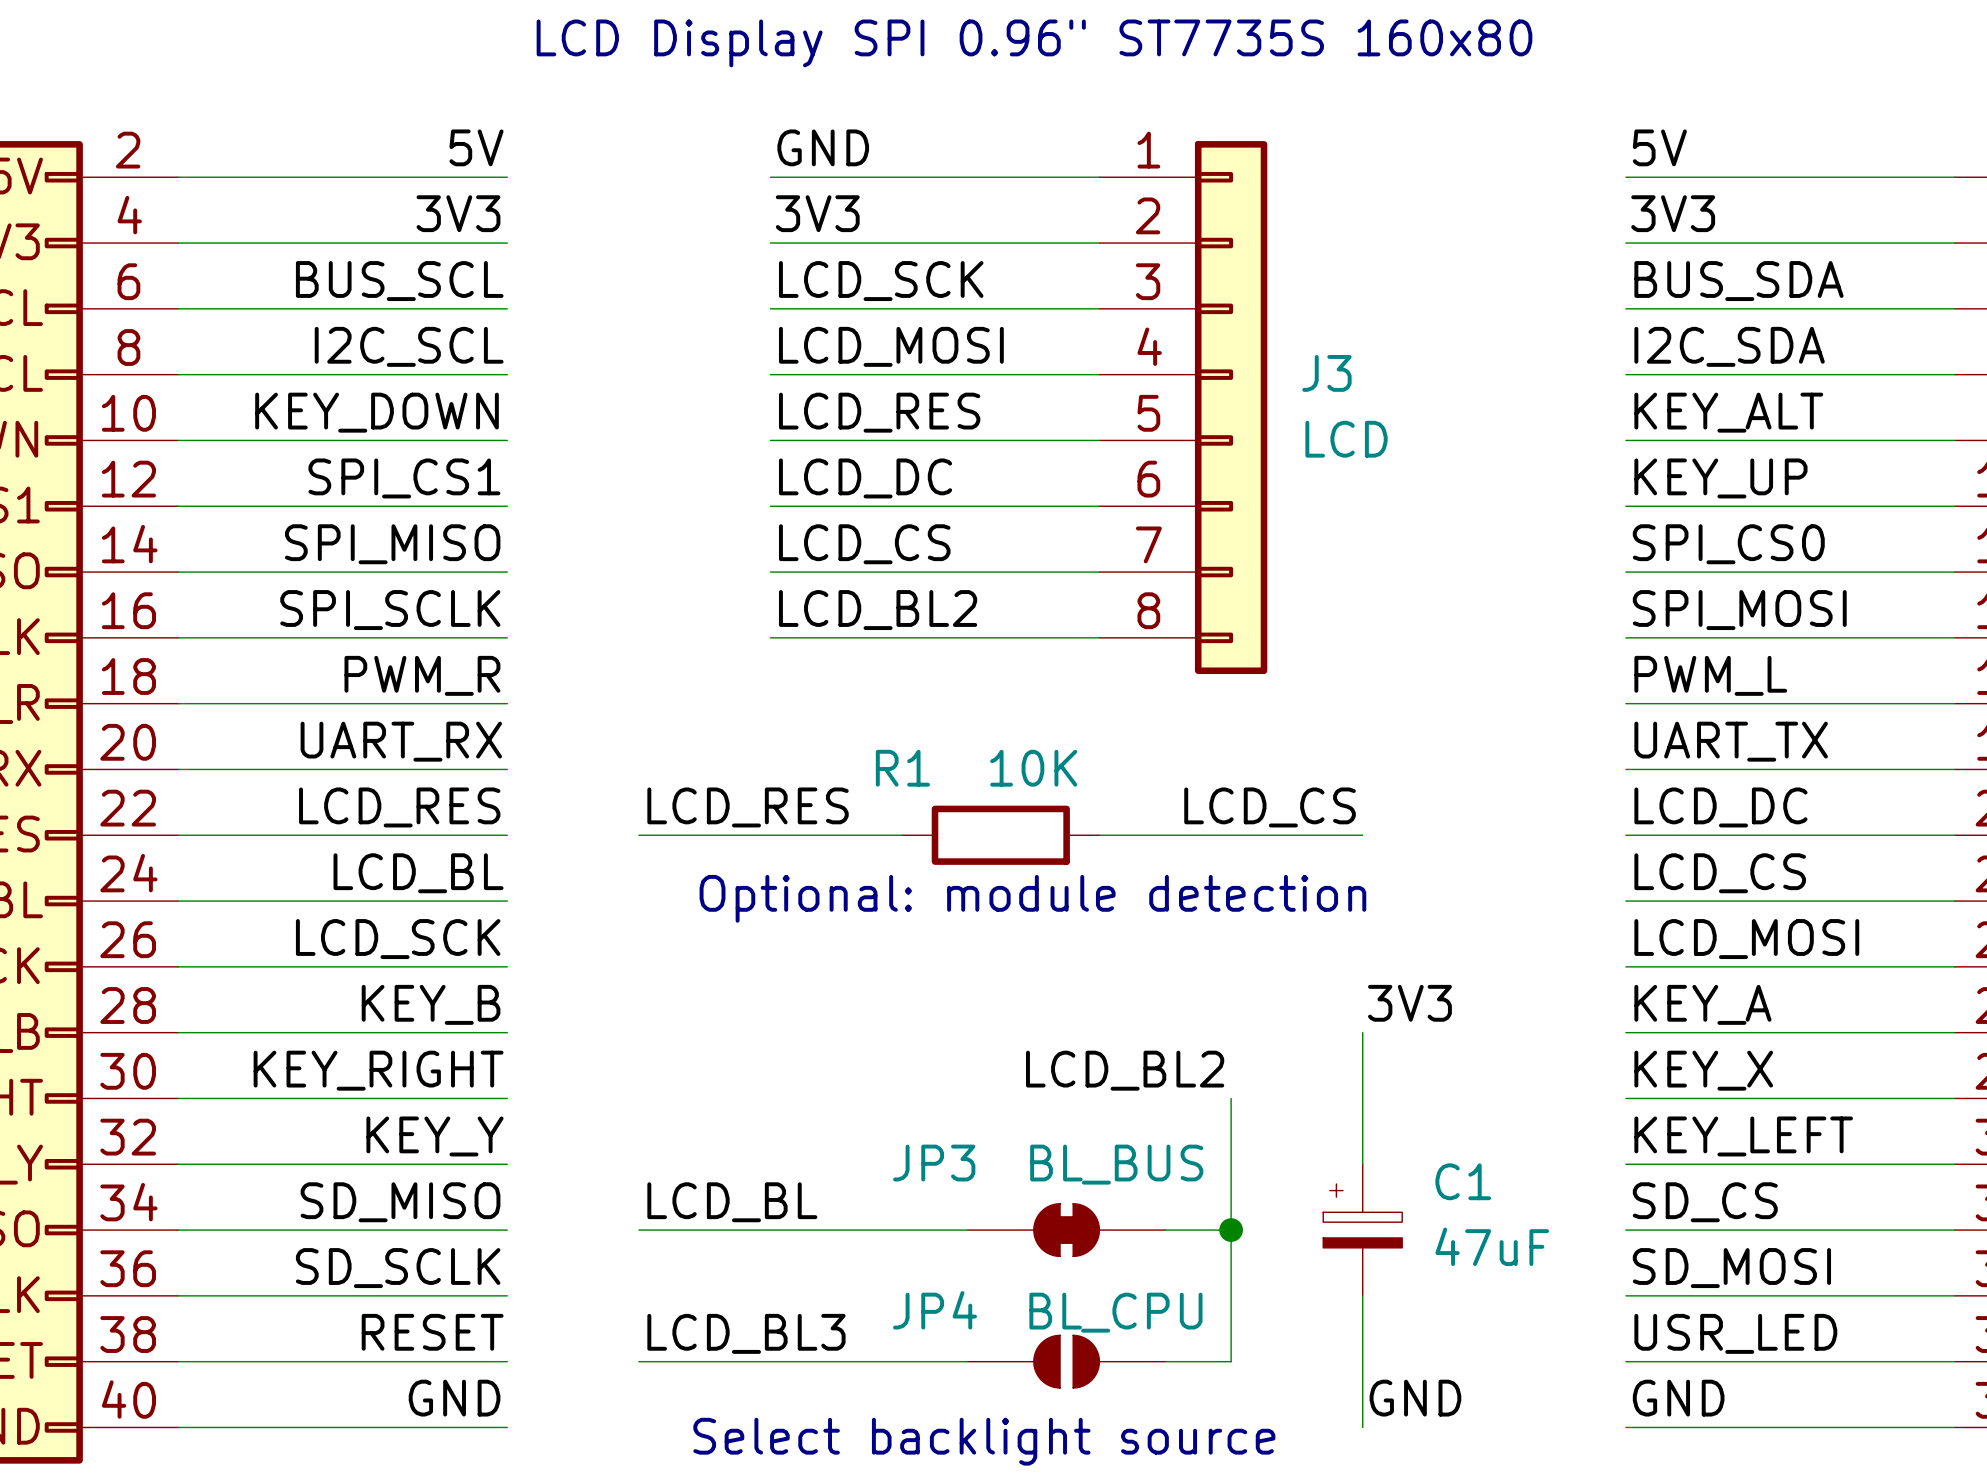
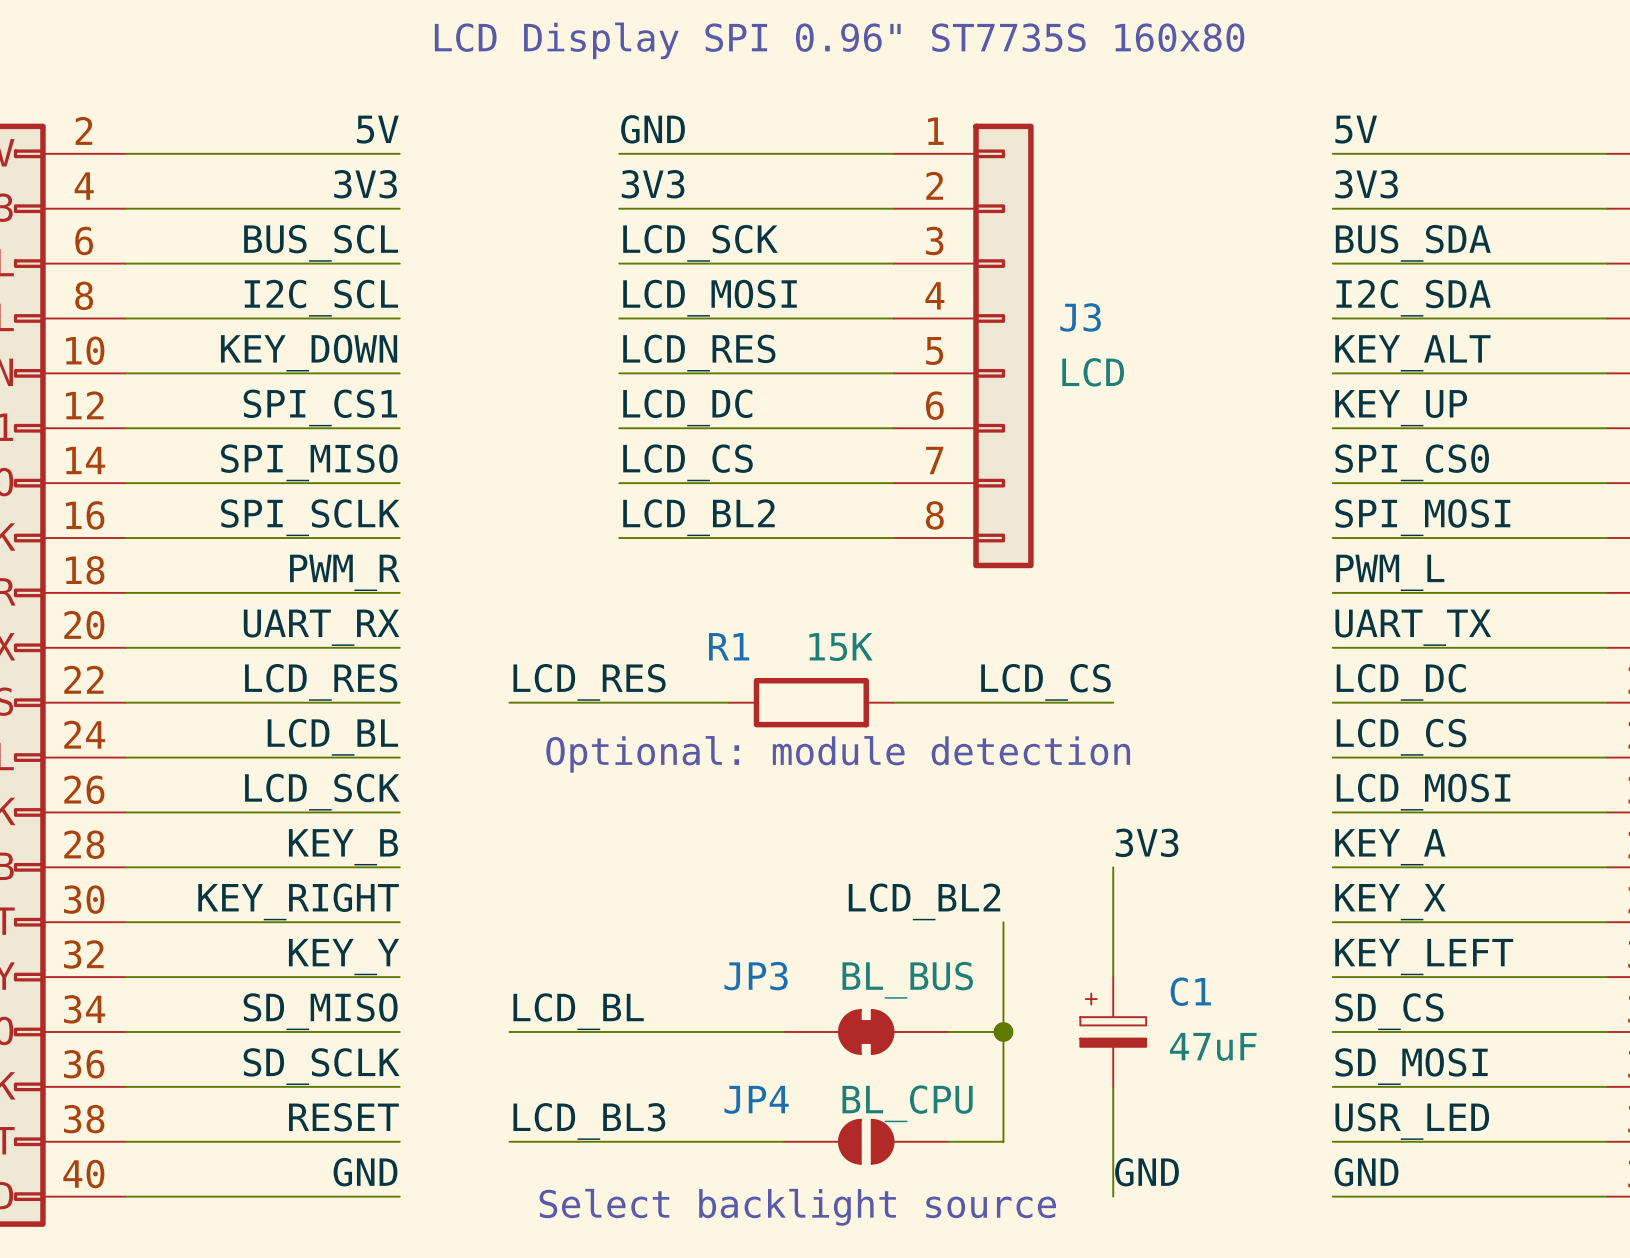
R1 value: 10K (1033, 768) -> 15K (840, 647)

